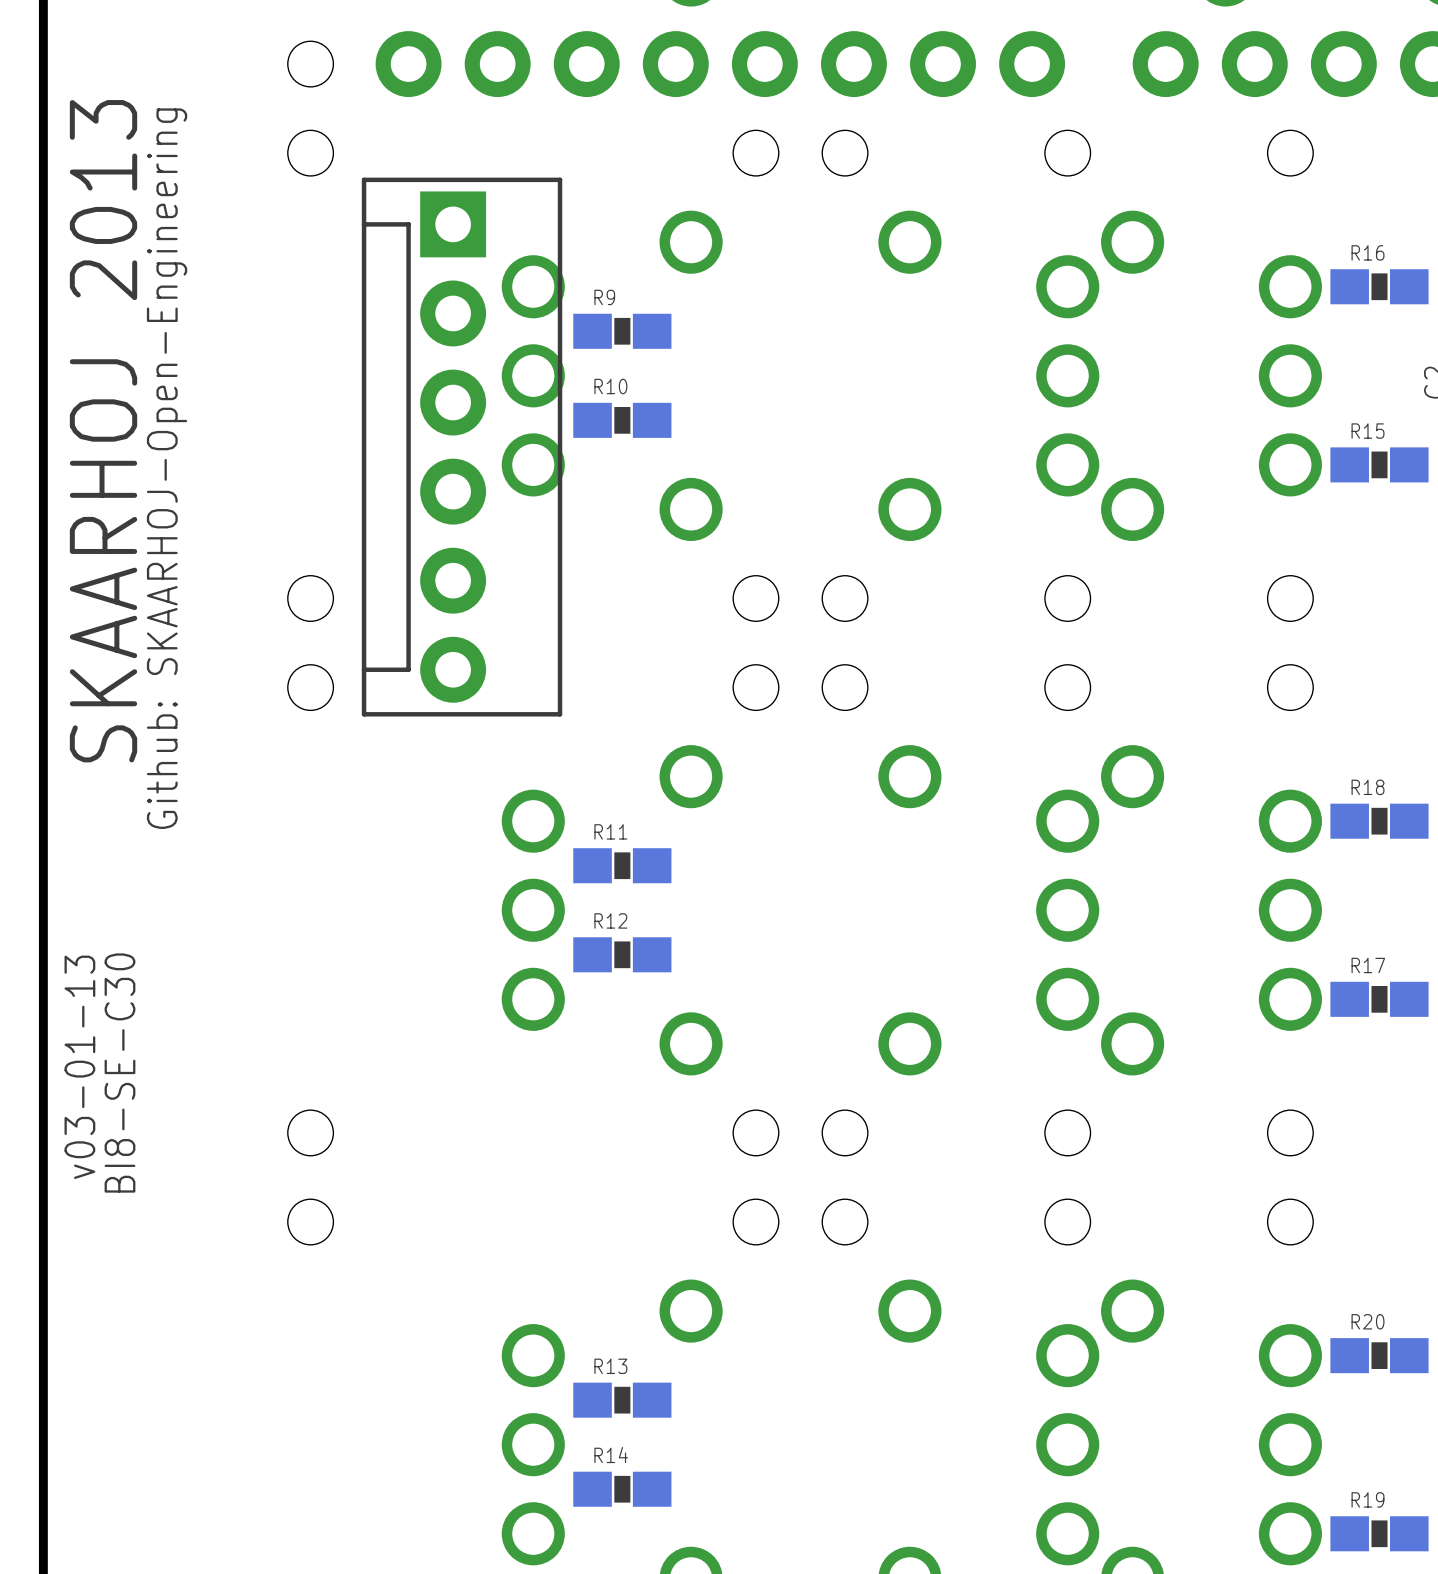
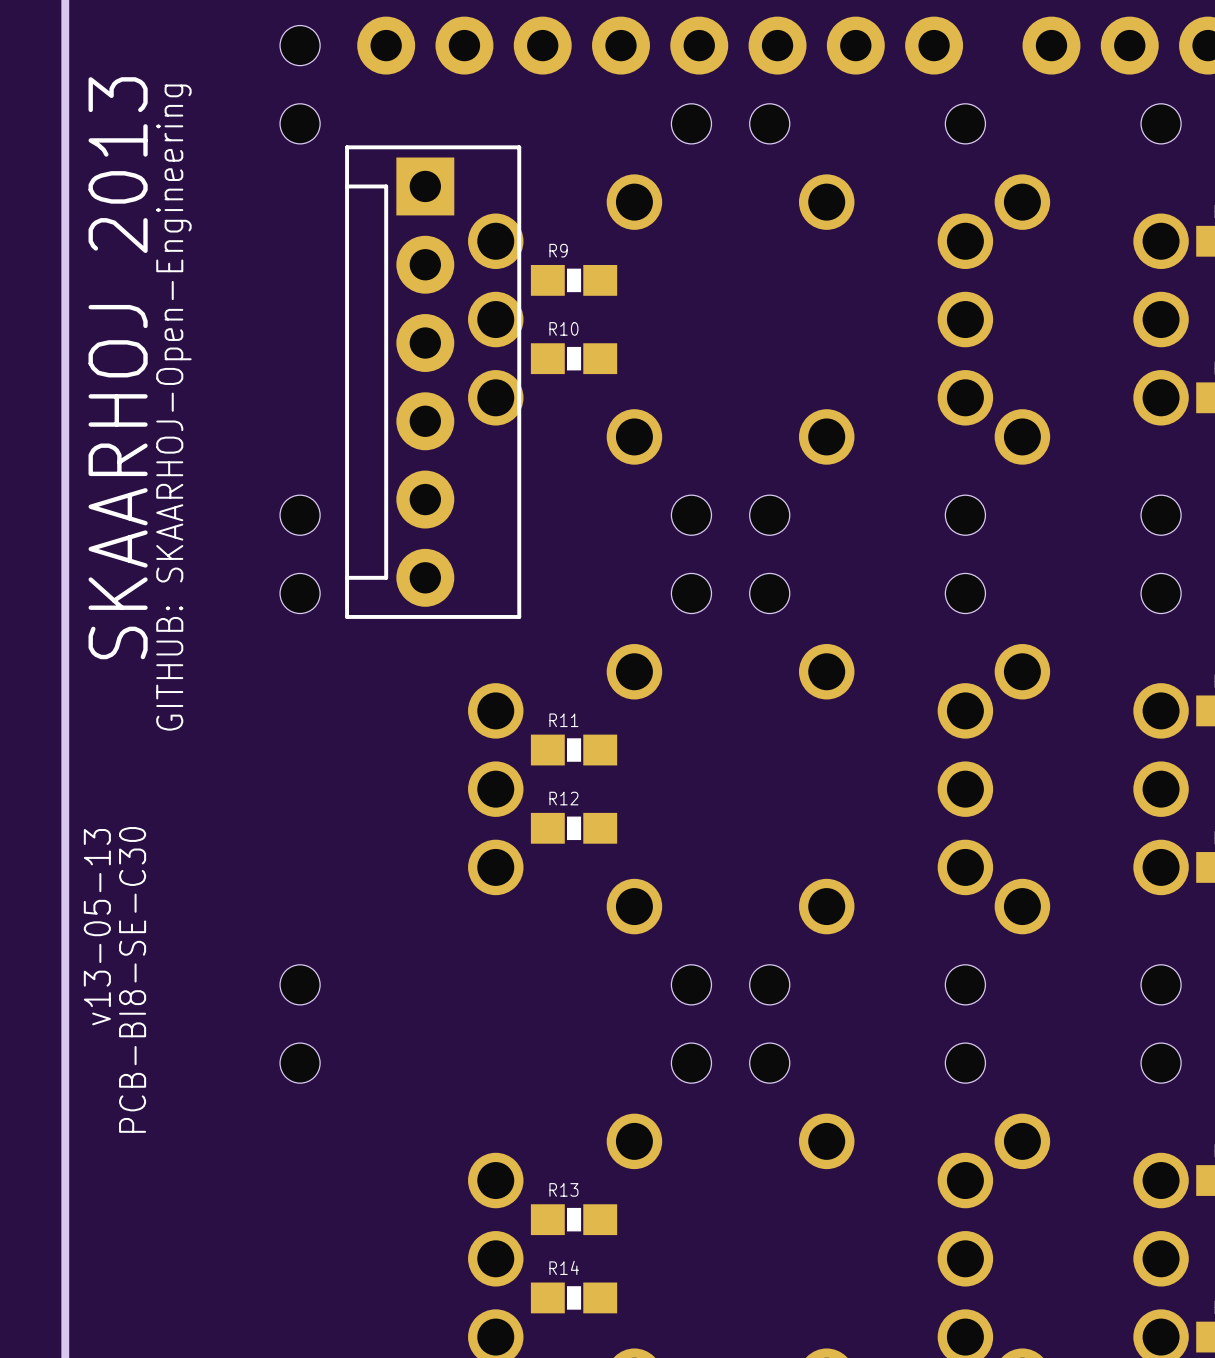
text: Github: SKAARHOJ-Open-Engineering (167, 468) -> GITHUB: SKAARHOJ-Open-Engineering (173, 407)
text: v03-01-13 (79, 1067) -> v13-05-13 (97, 927)
text: BI8-SE-C30 (119, 1073) -> PCB-BI8-SE-C30 (132, 979)

